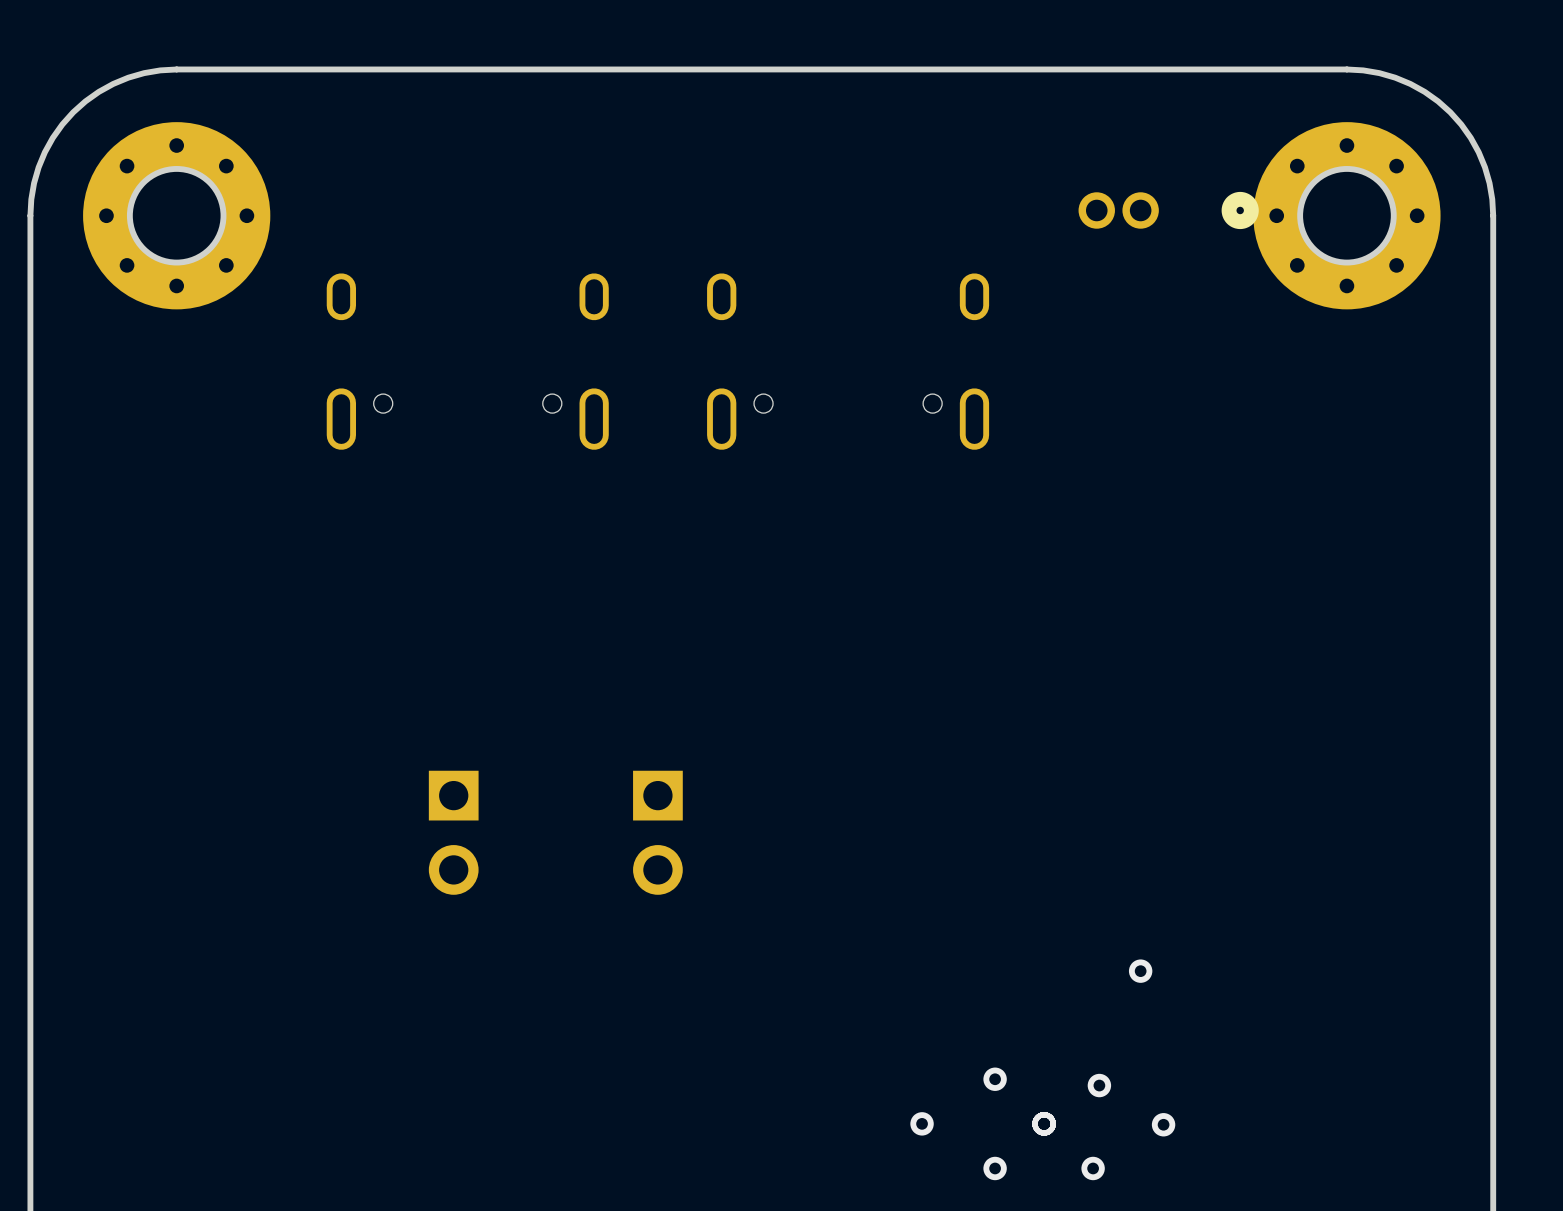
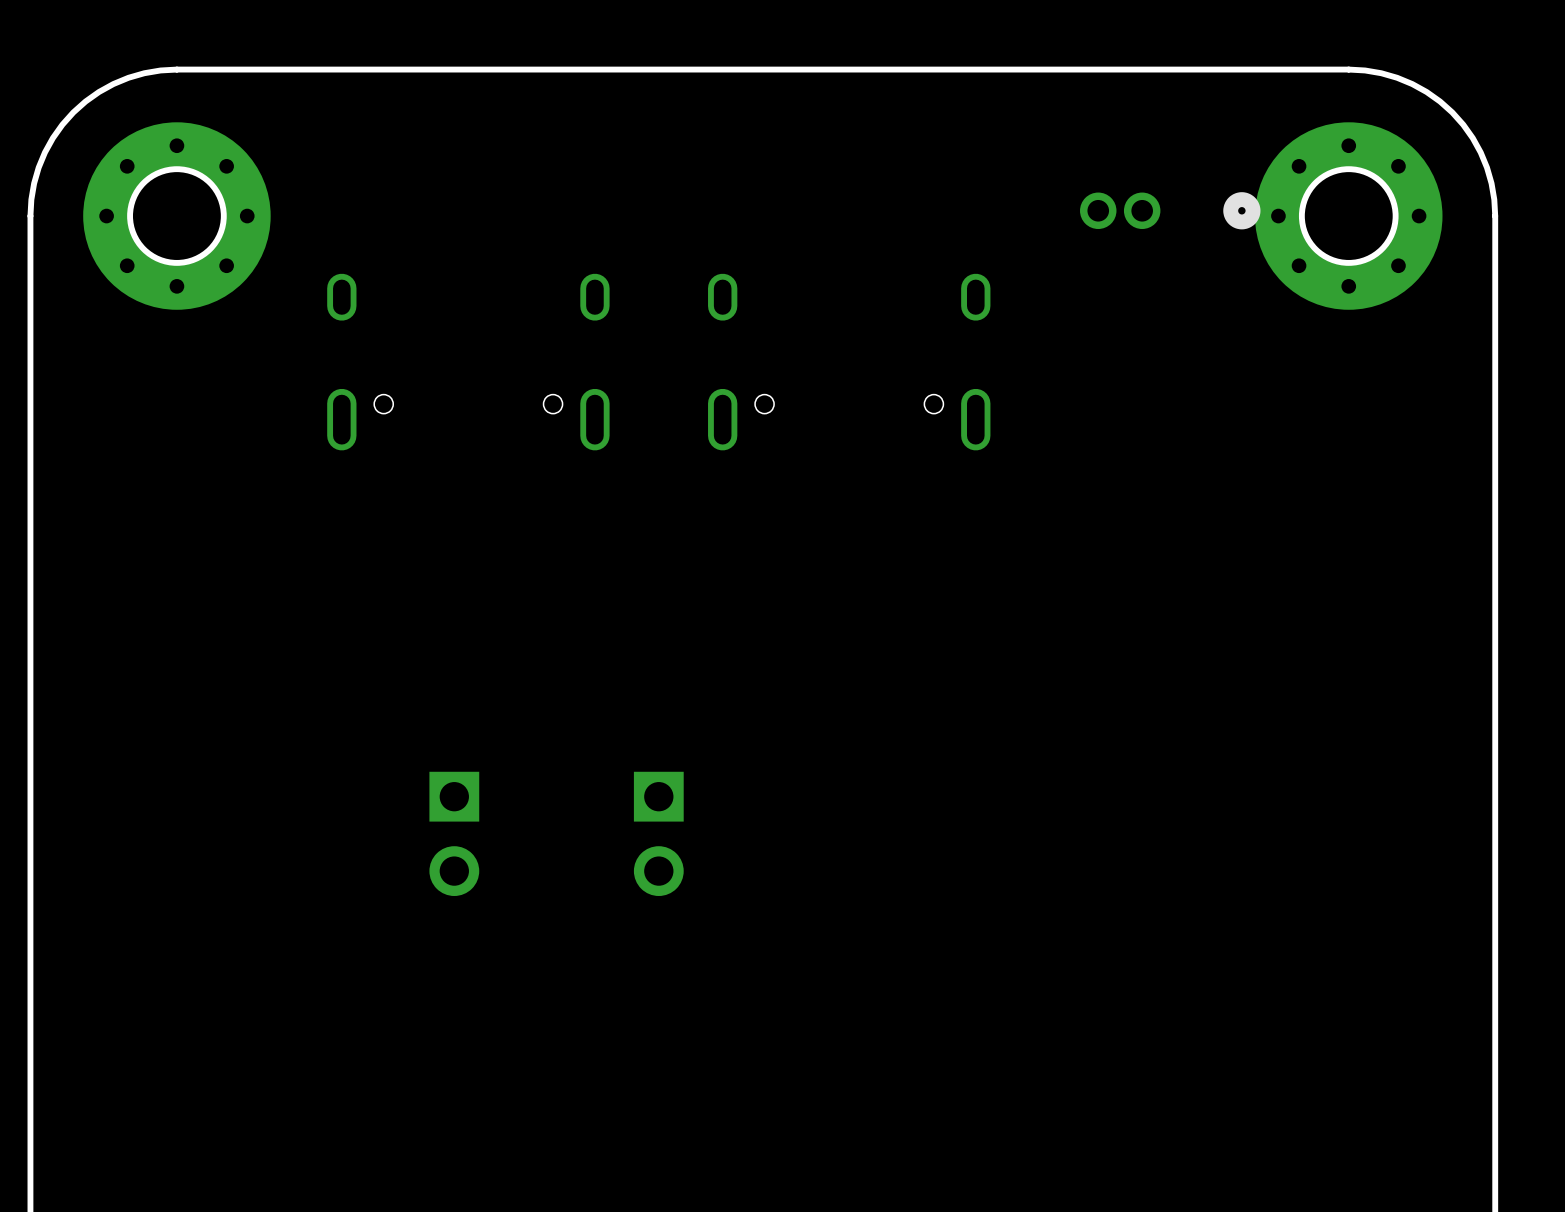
via: (1140, 971) -> none
via: (995, 1079) -> none
via: (1099, 1085) -> none
via: (922, 1123) -> none
via: (1044, 1123) -> none
via: (1163, 1124) -> none
via: (995, 1168) -> none
via: (1093, 1168) -> none

